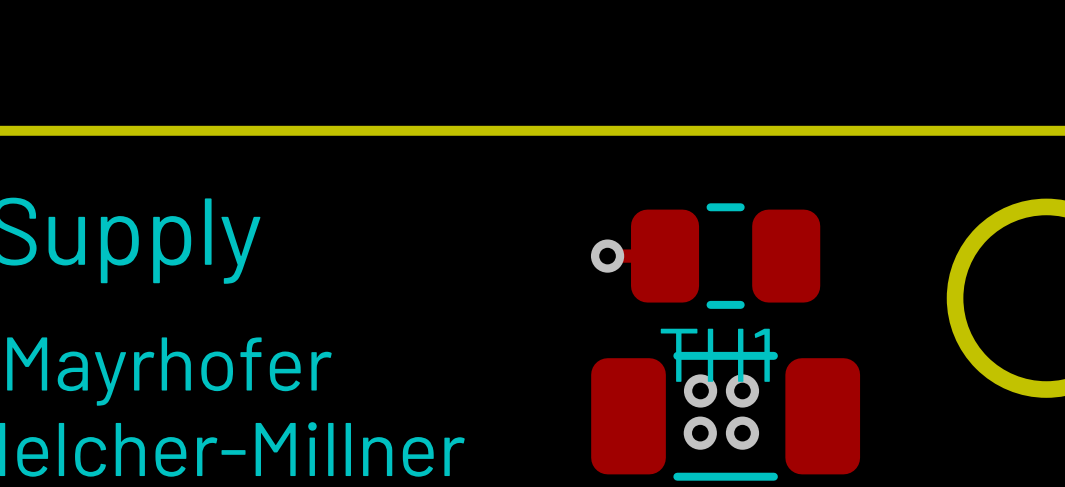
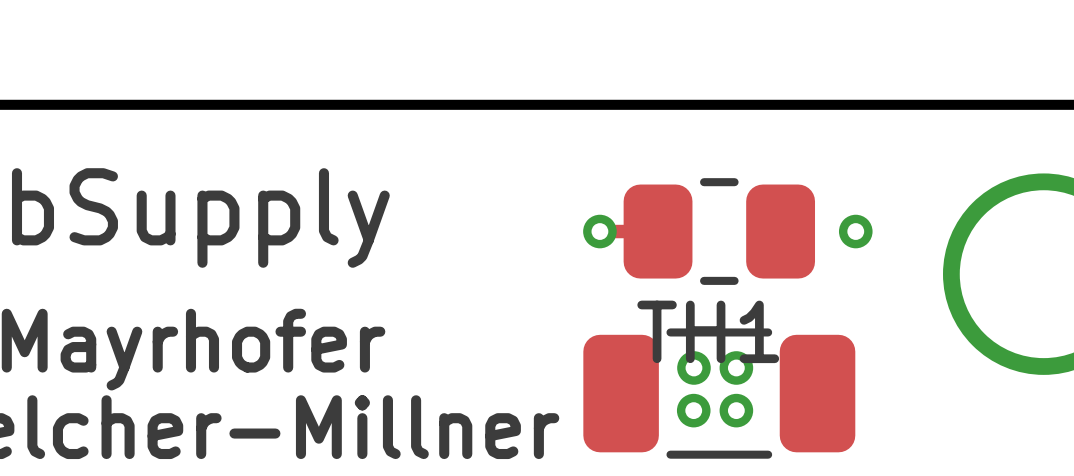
via: none -> (855, 231)

